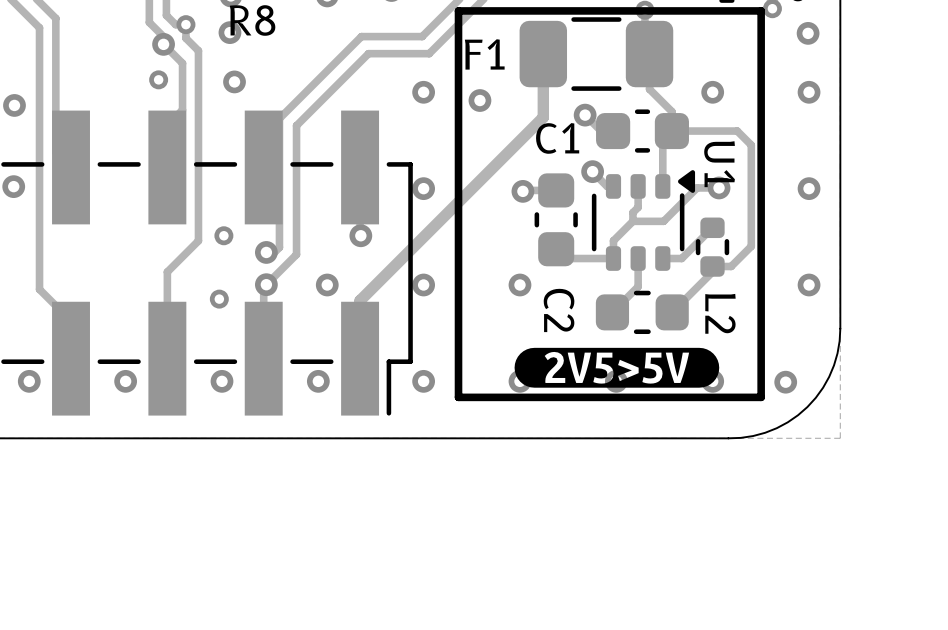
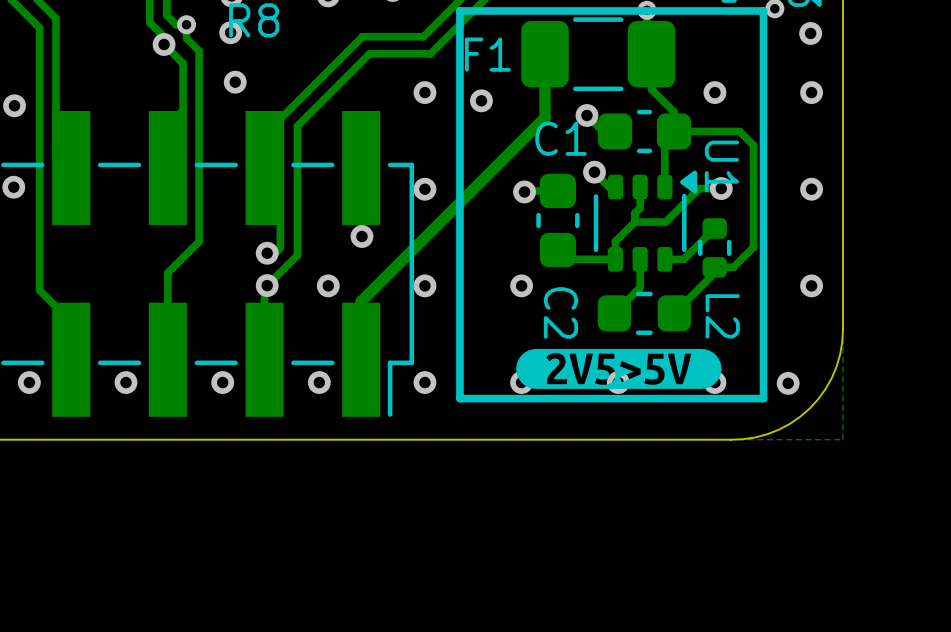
via: (158, 79) -> none
via: (223, 235) -> none
via: (219, 299) -> none

